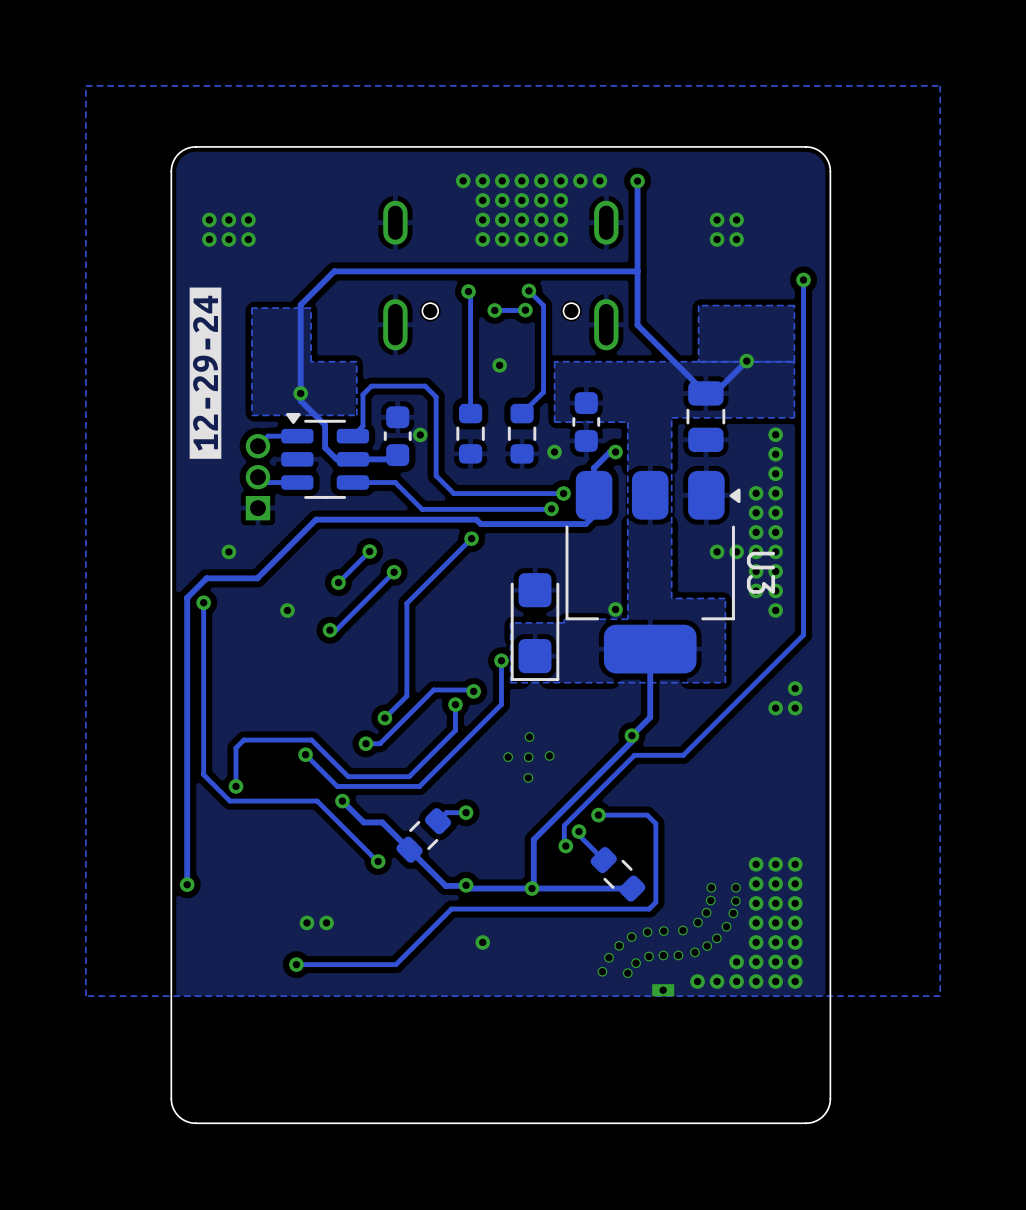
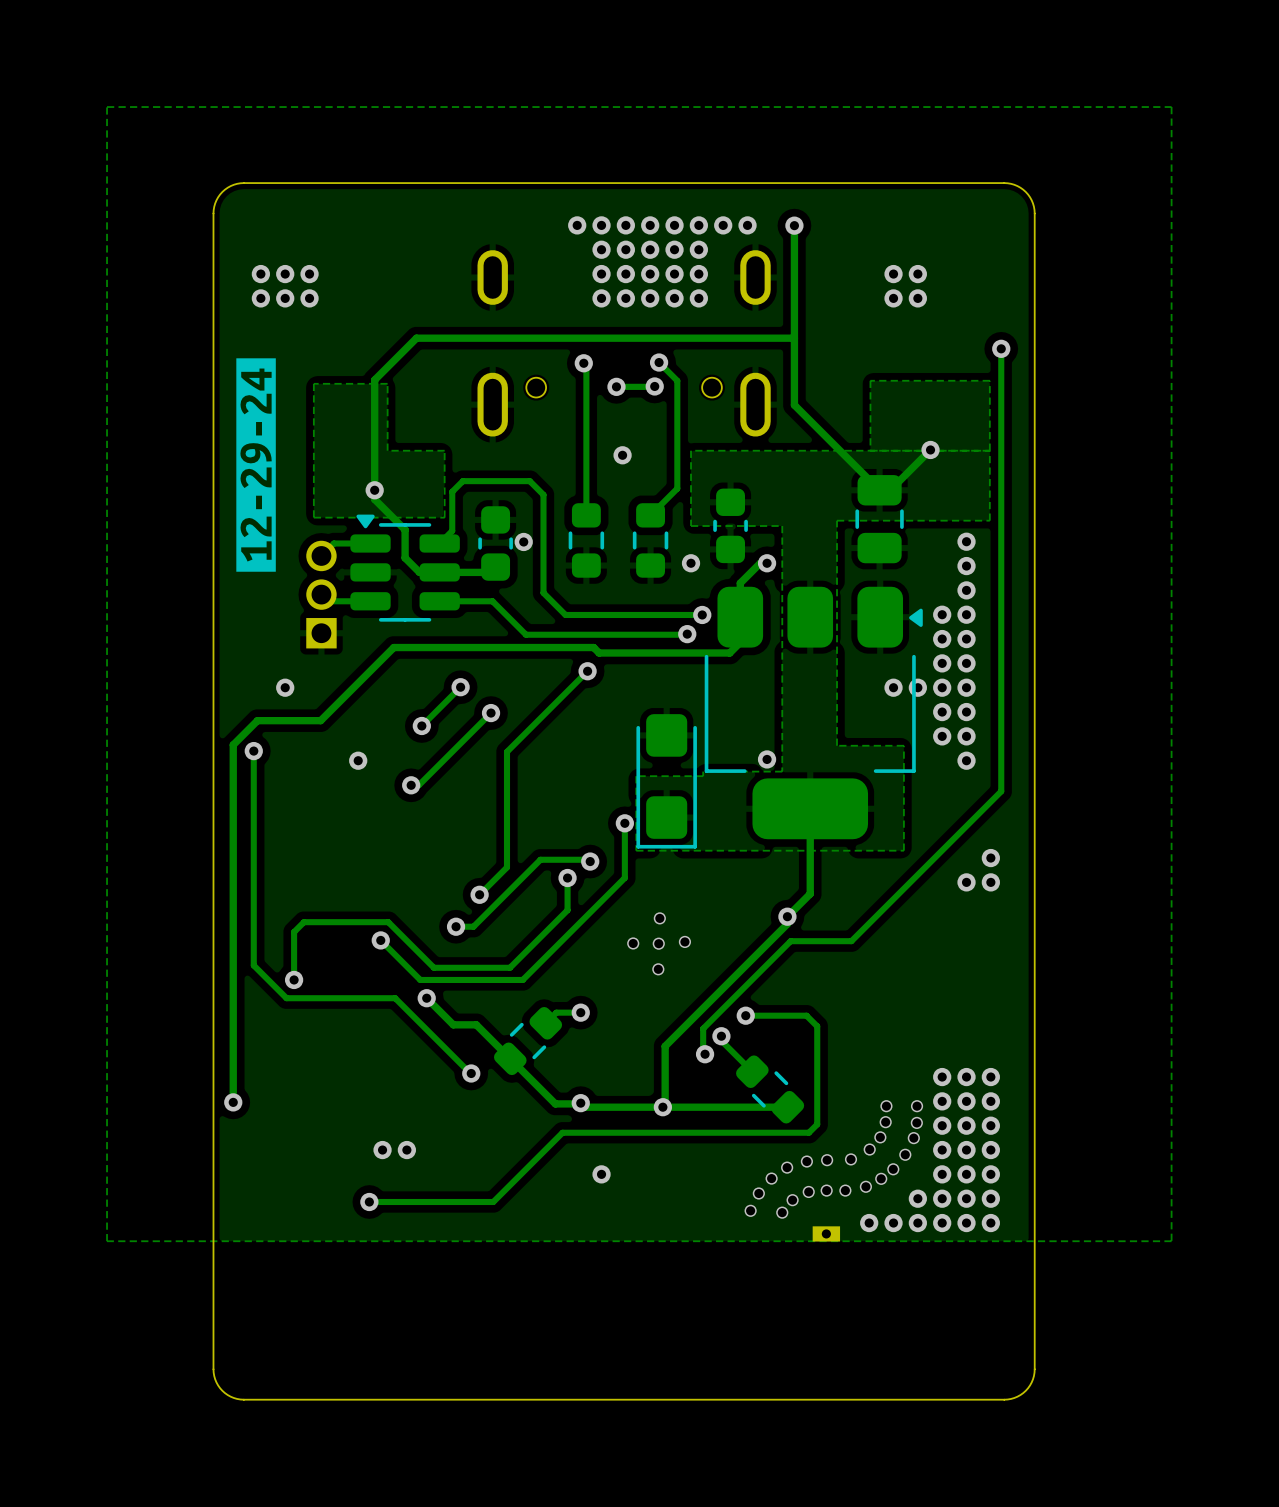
U3 name: U3 (760, 572) -> none

